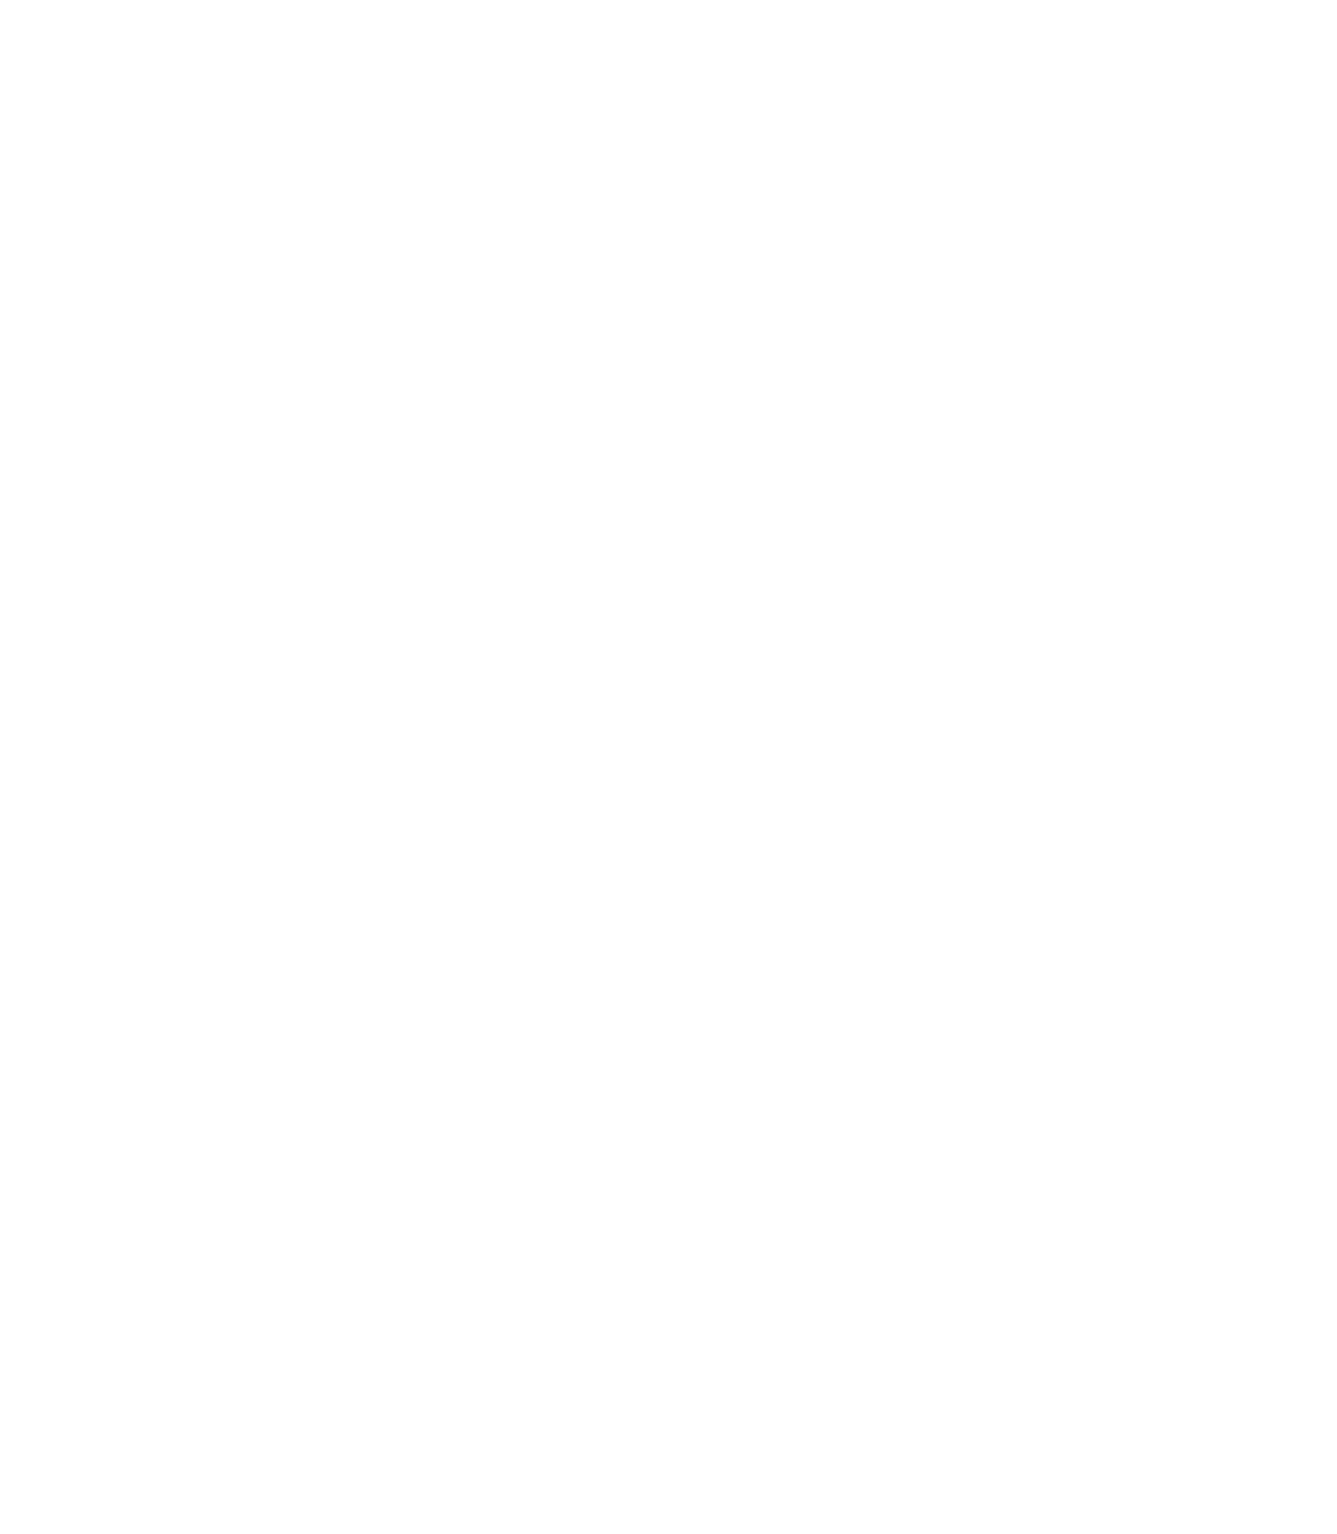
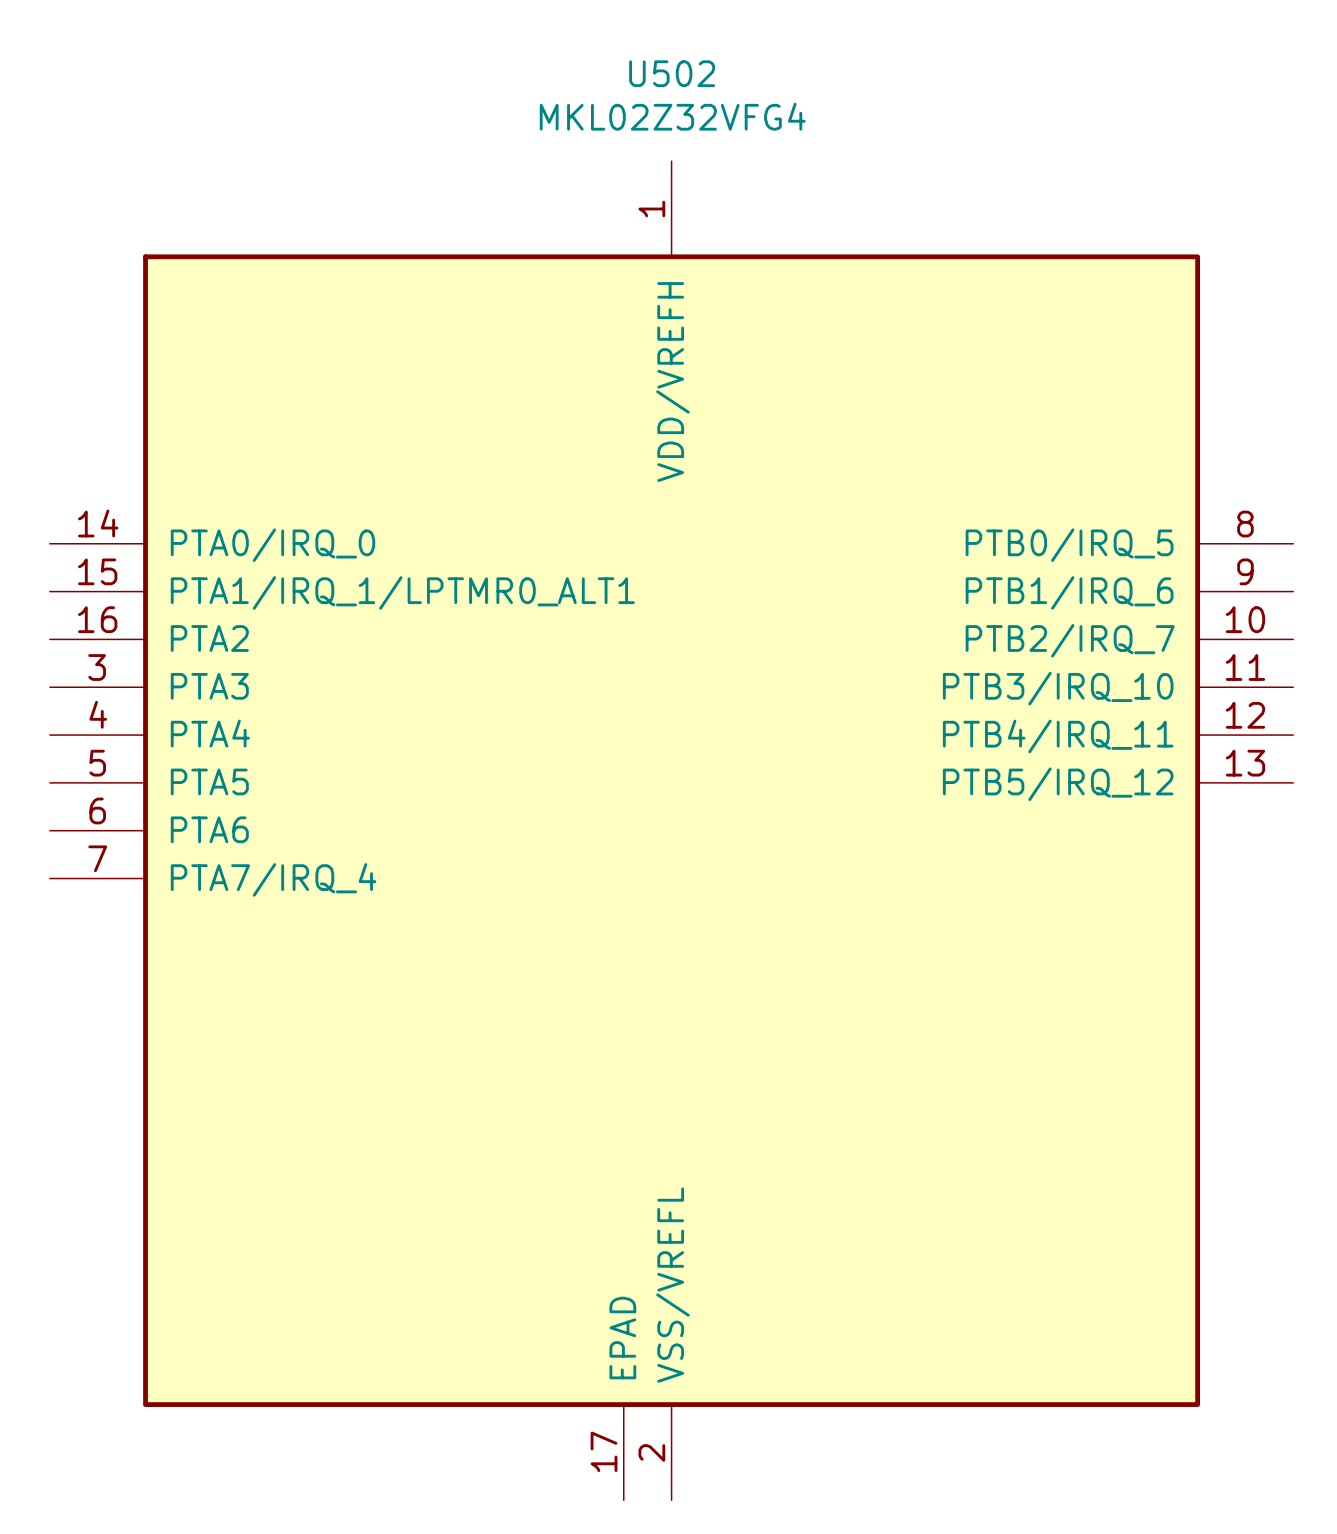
U502: none -> MKL02Z32VFG4 (671, 830)

